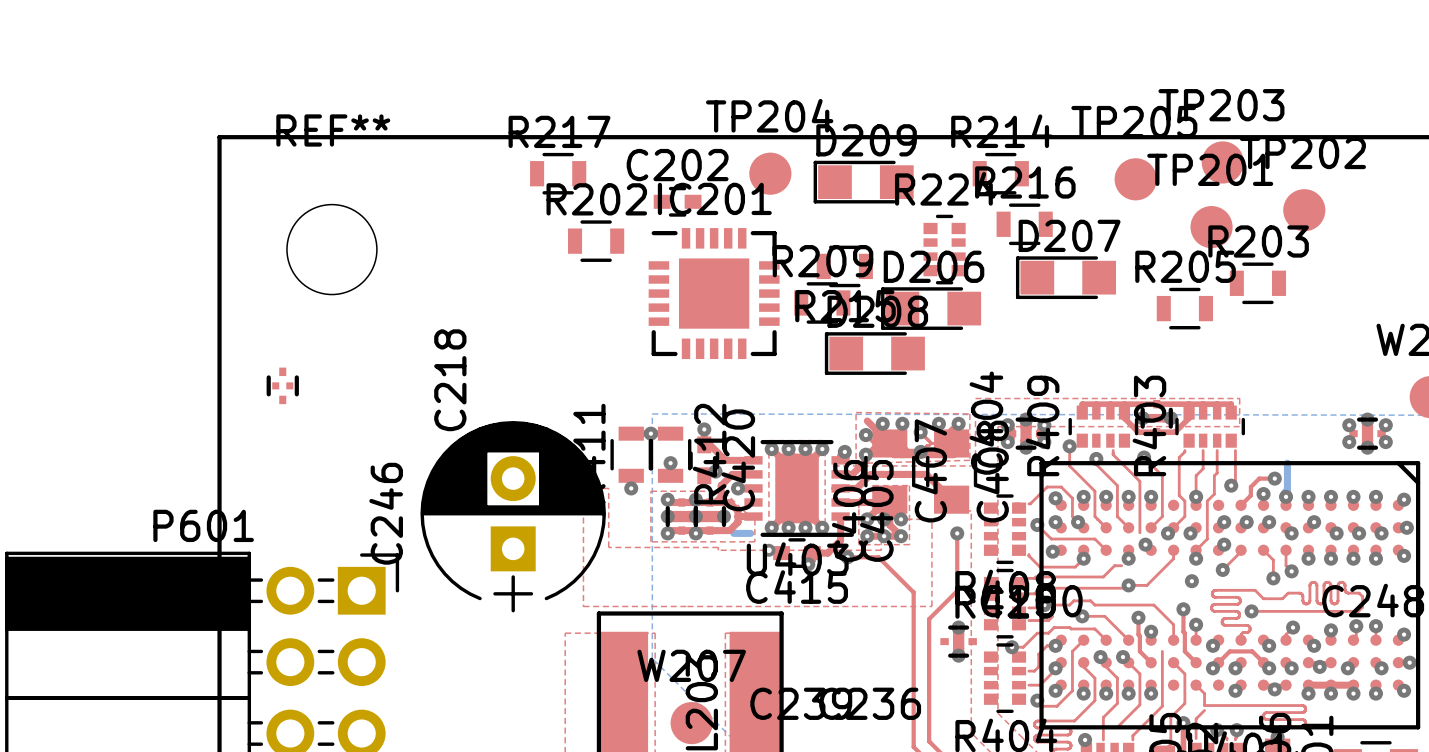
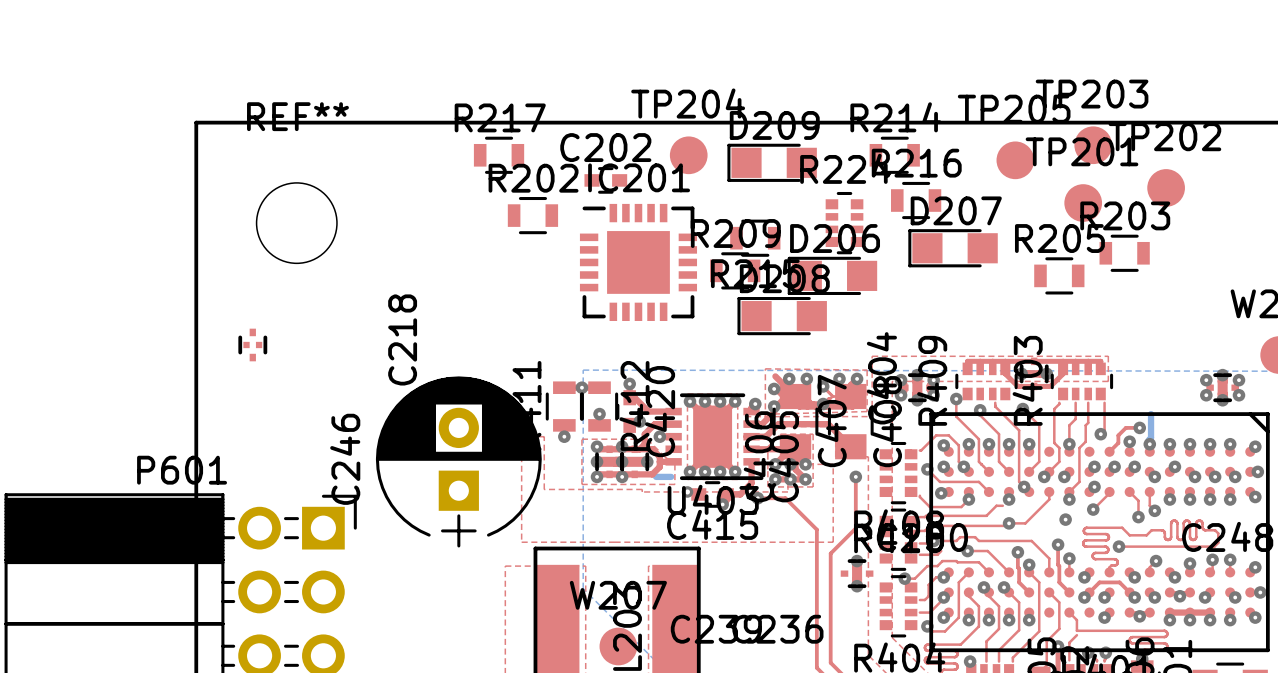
top track: none -> (1019, 476) (1019, 481) (1024, 486)
top track: none -> (1029, 572) (1039, 582)
top track: none -> (999, 650) (999, 661)

